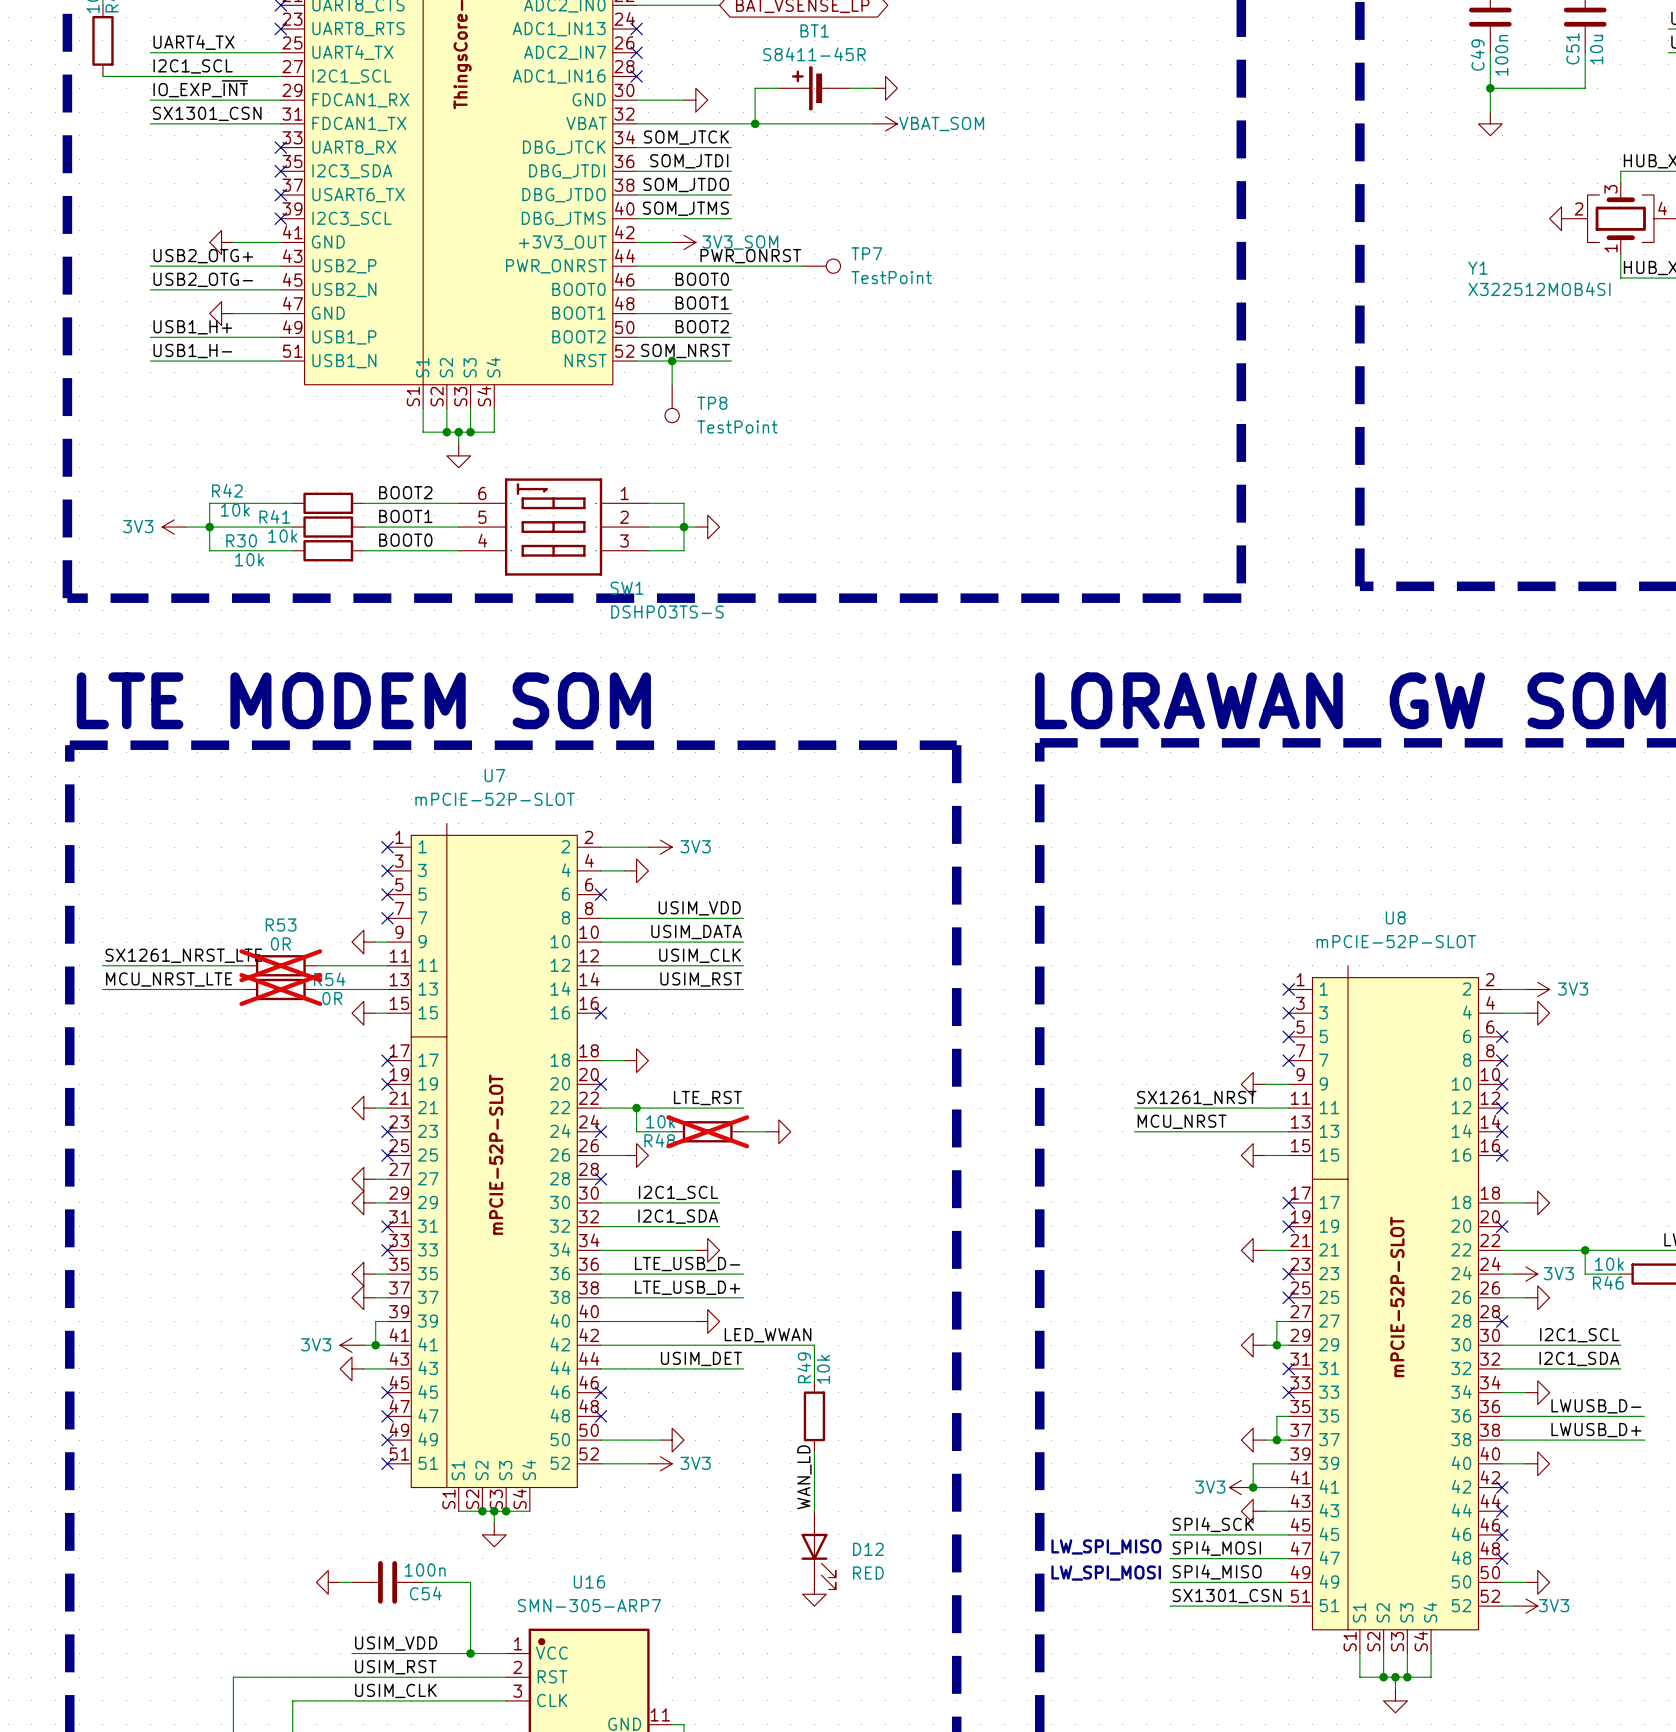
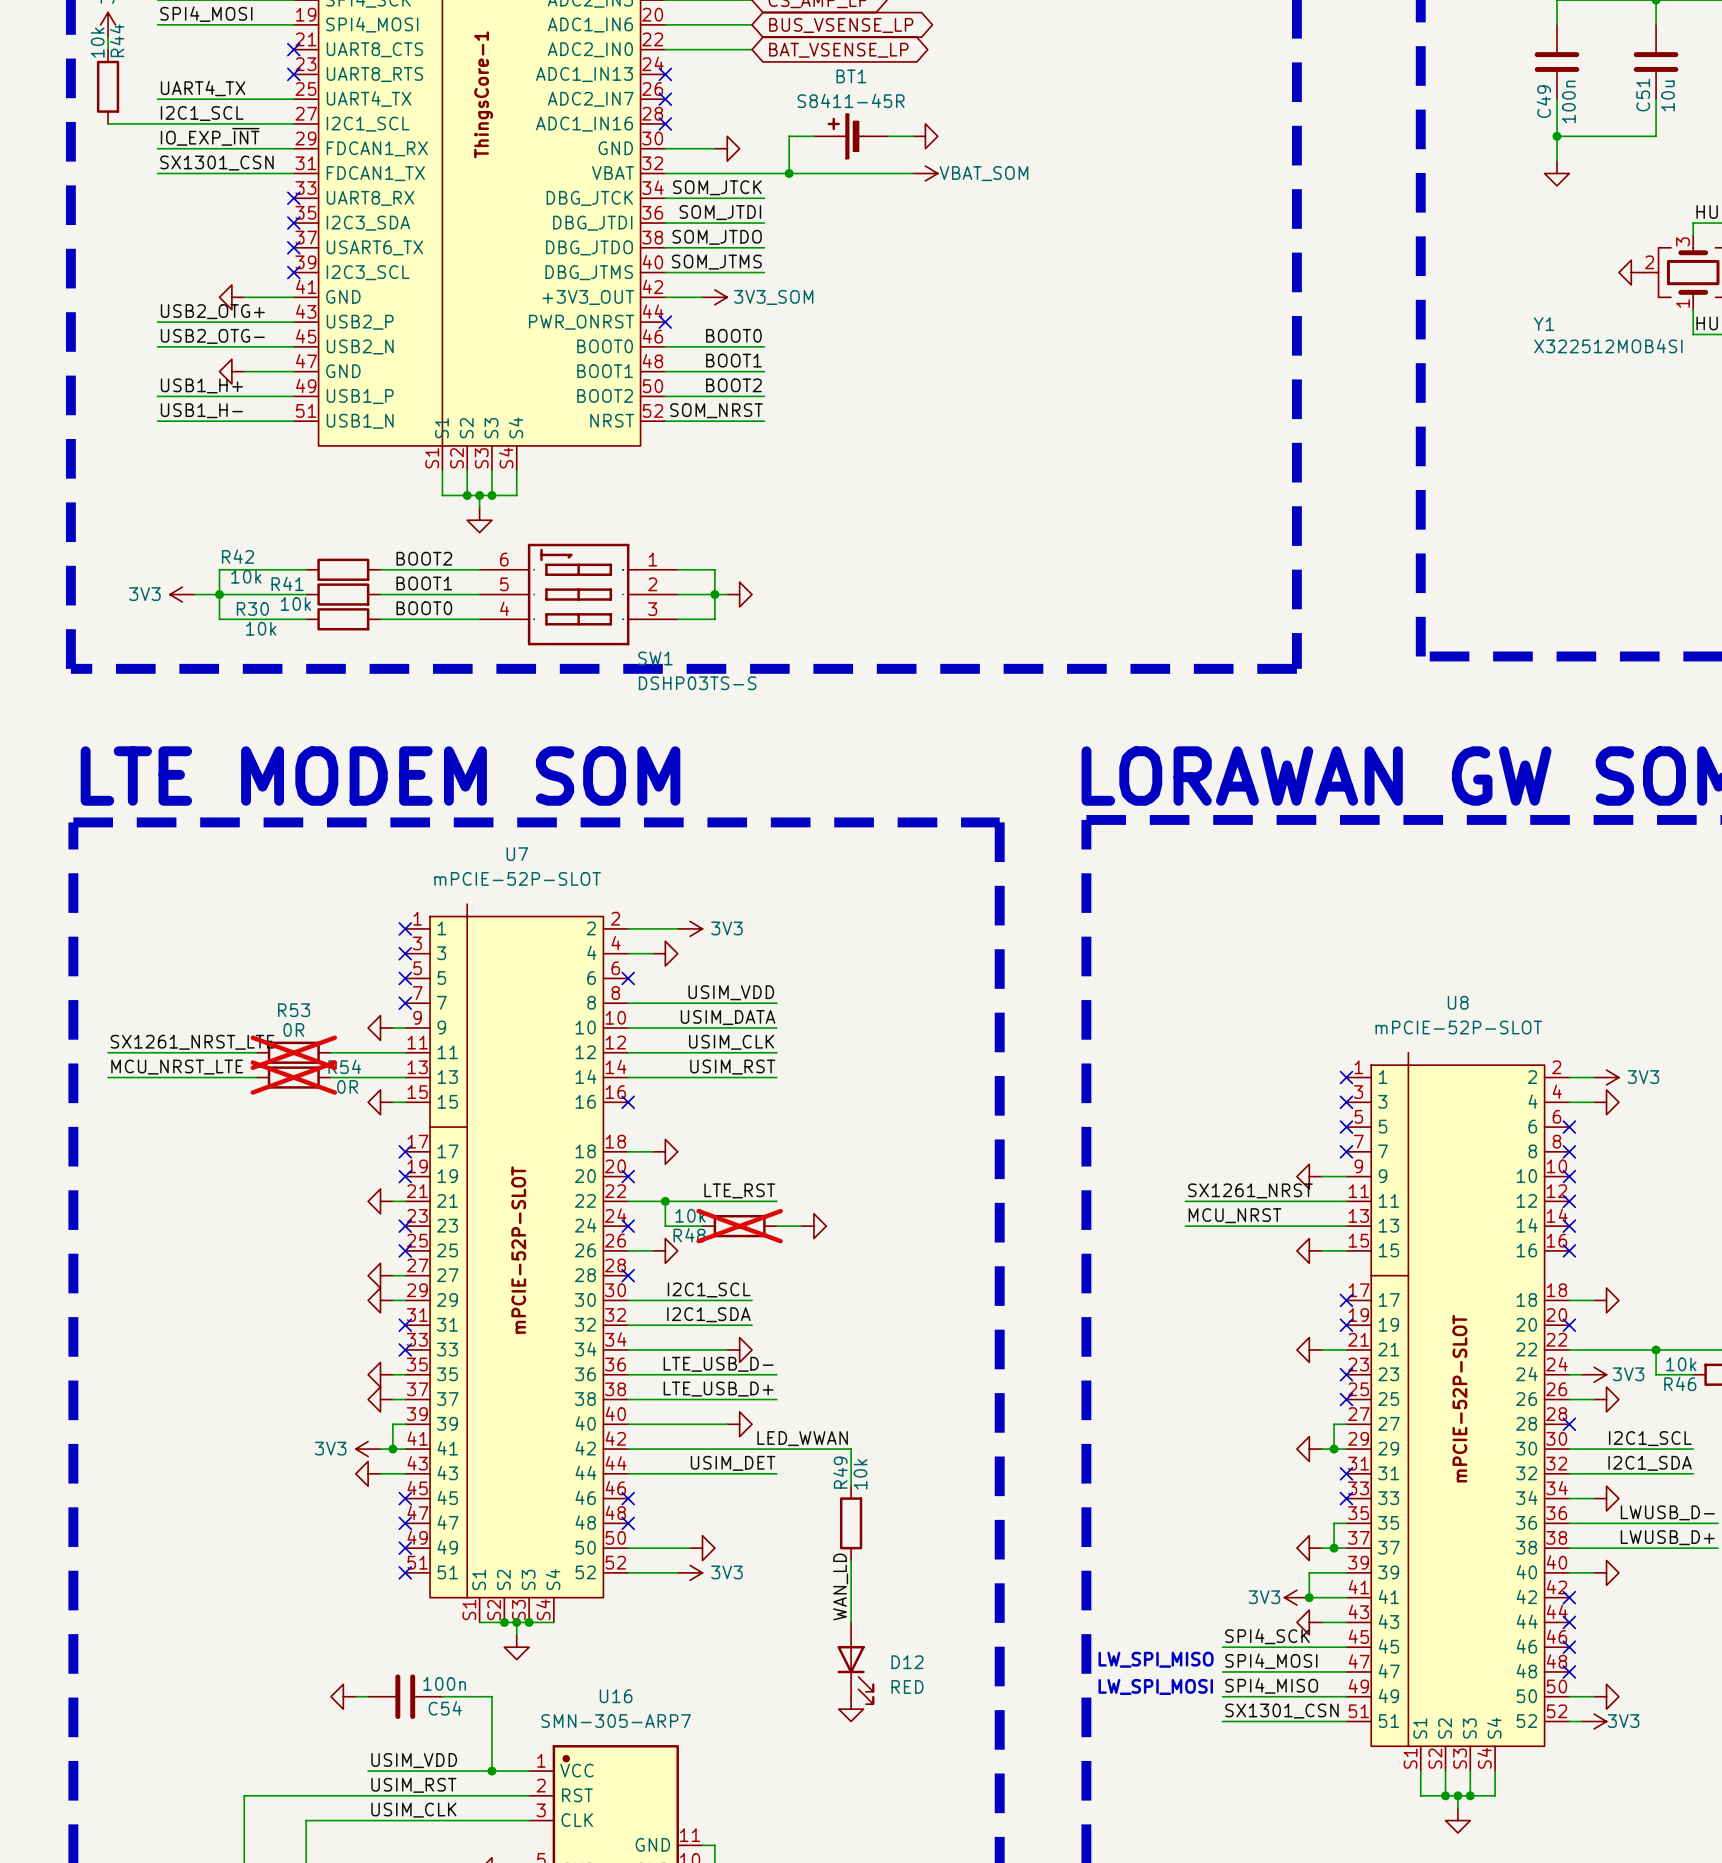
label: PWR_ONRST (750, 256) -> none
wire: (636, 266) (802, 266) -> none
no-connect mark: none -> (665, 322)
TP7: TestPoint (821, 266) -> none
wire: (672, 361) (672, 384) -> none
junction: (672, 361) -> none
TP8: TestPoint (672, 403) -> none

